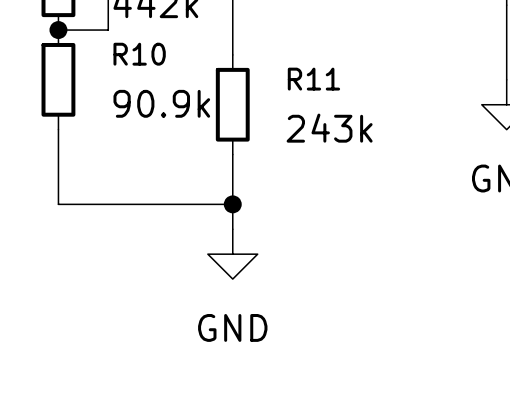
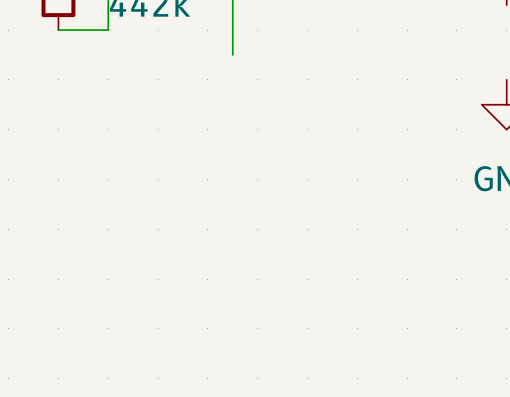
wire: (506, 5) (506, 79) -> none
junction: (58, 30) -> none
R10: 90.9k (58, 79) -> none
R11: 243k (232, 104) -> none
wire: (58, 129) (58, 204) (232, 204) -> none
wire: (232, 154) (232, 229) -> none
junction: (232, 204) -> none
power symbol: GND (232, 254) -> none

